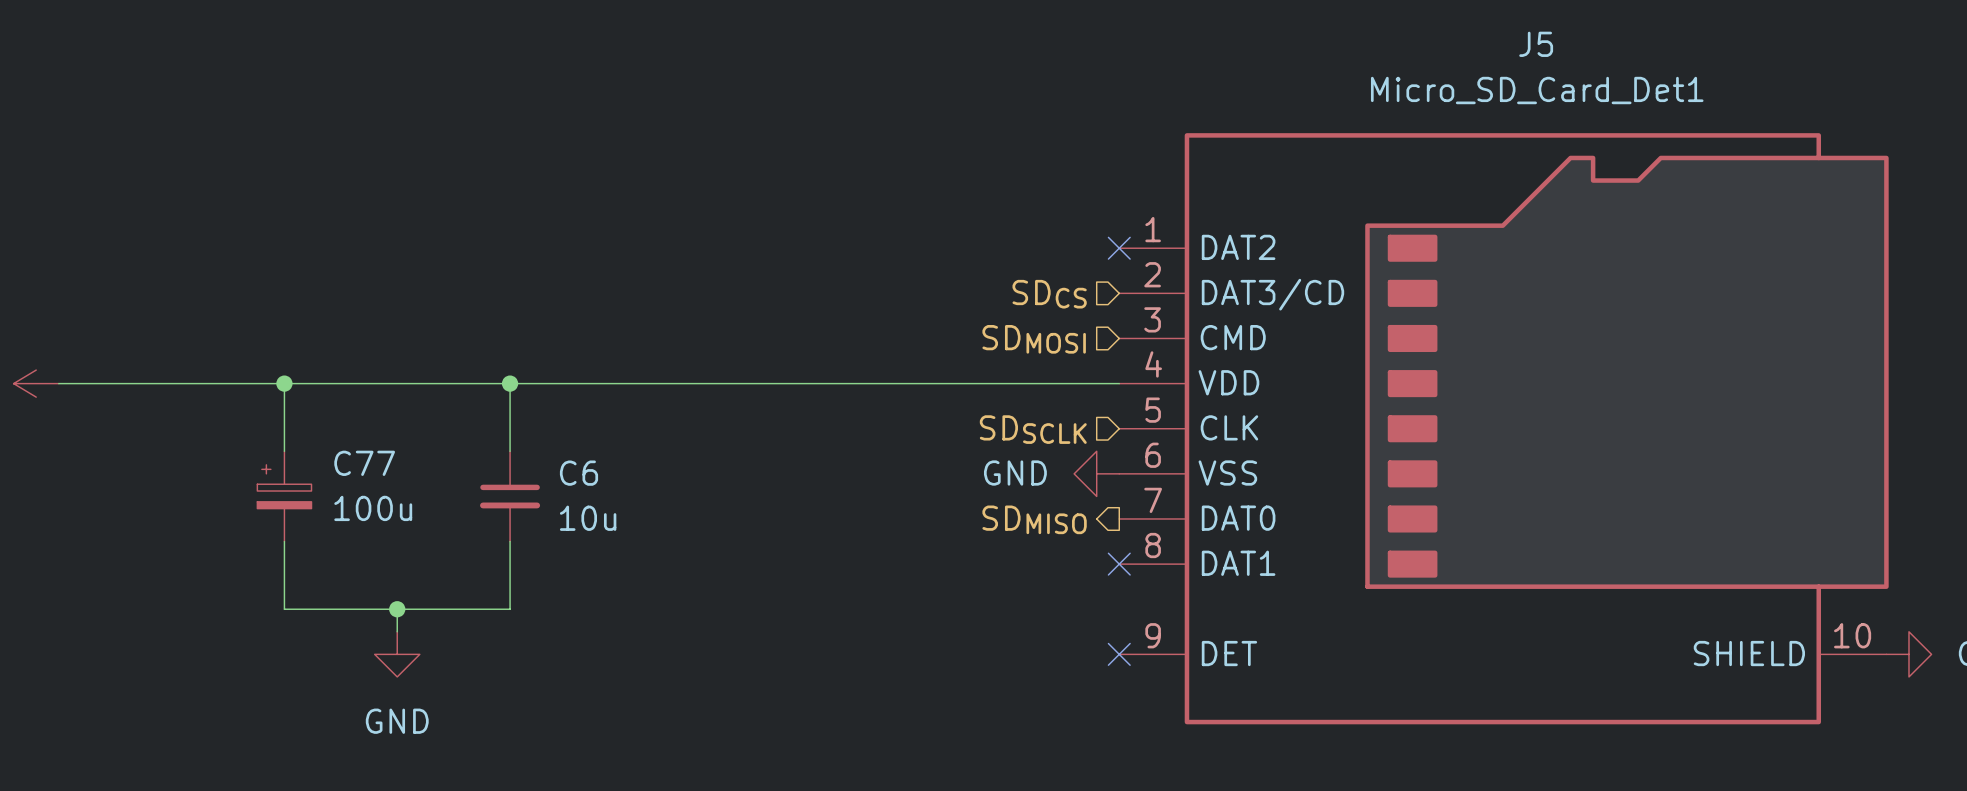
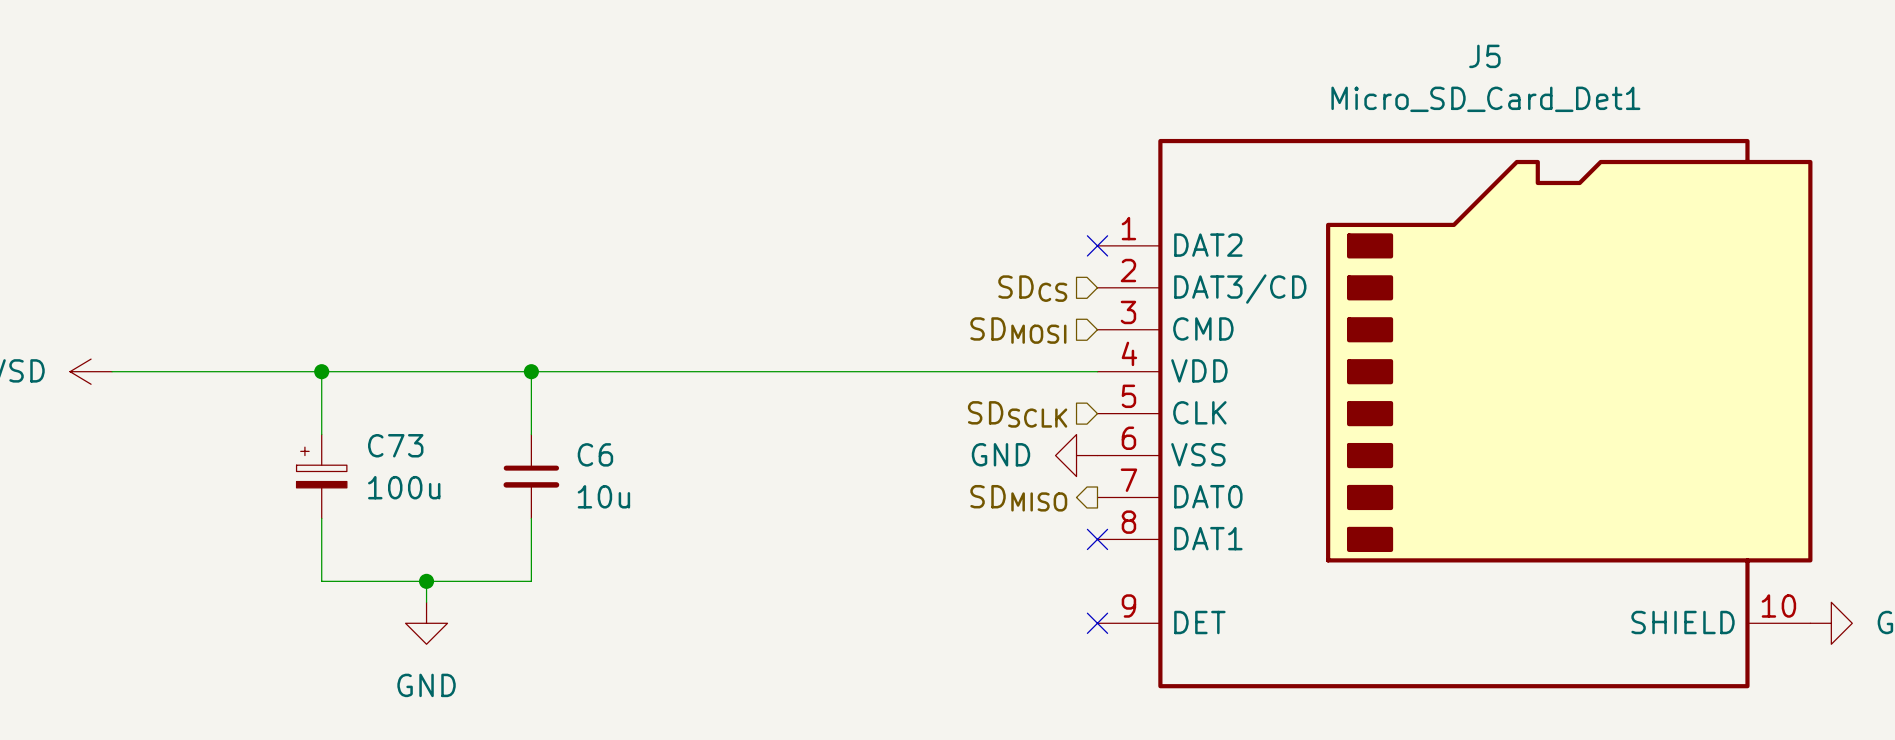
C77 name: C77 (364, 463) -> C73 (395, 445)

